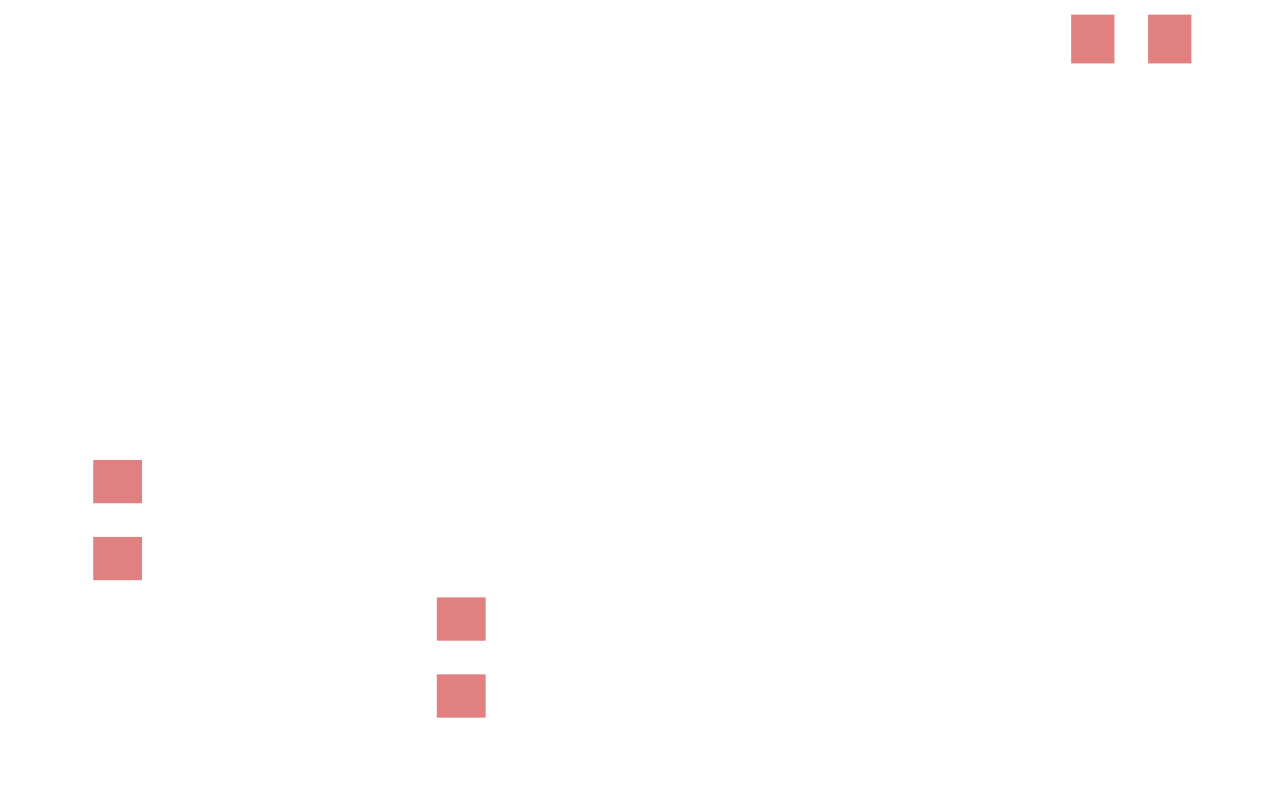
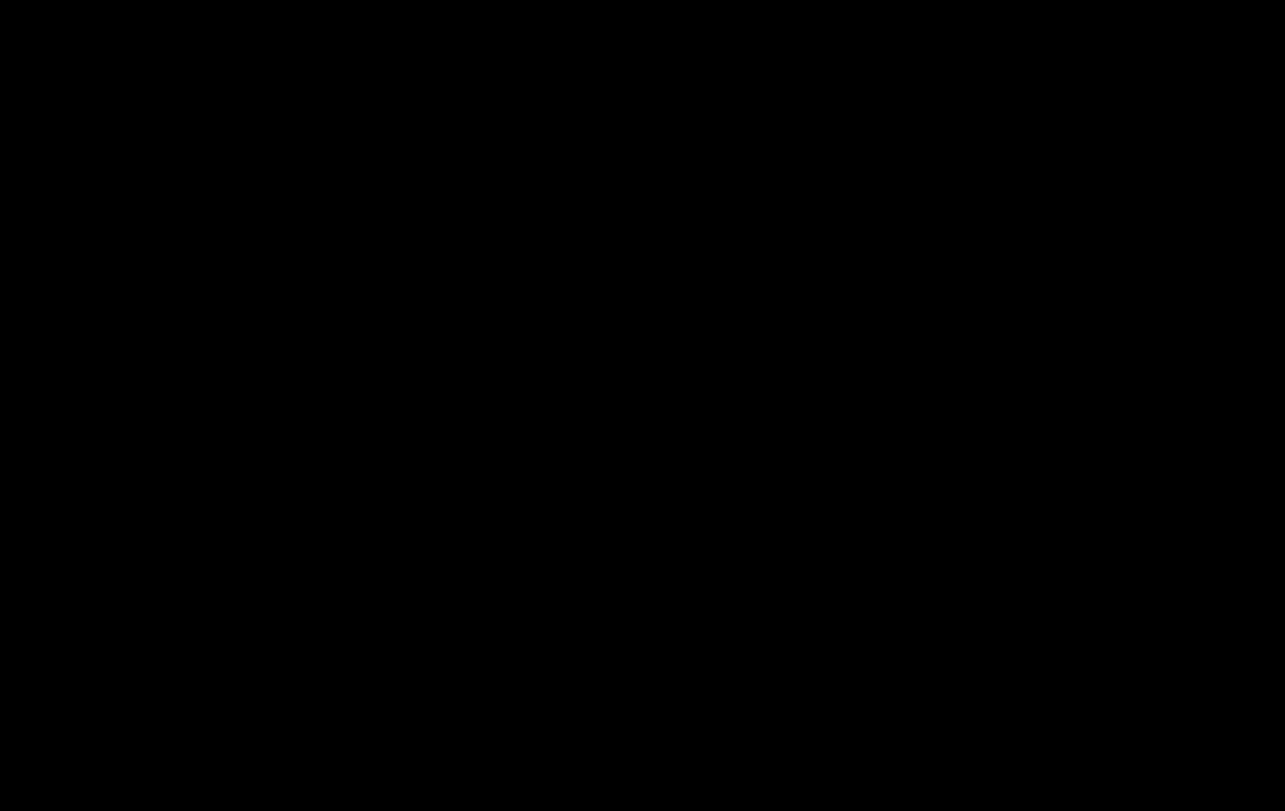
part: (1131, 39) -> none
part: (117, 520) -> none
part: (461, 657) -> none

